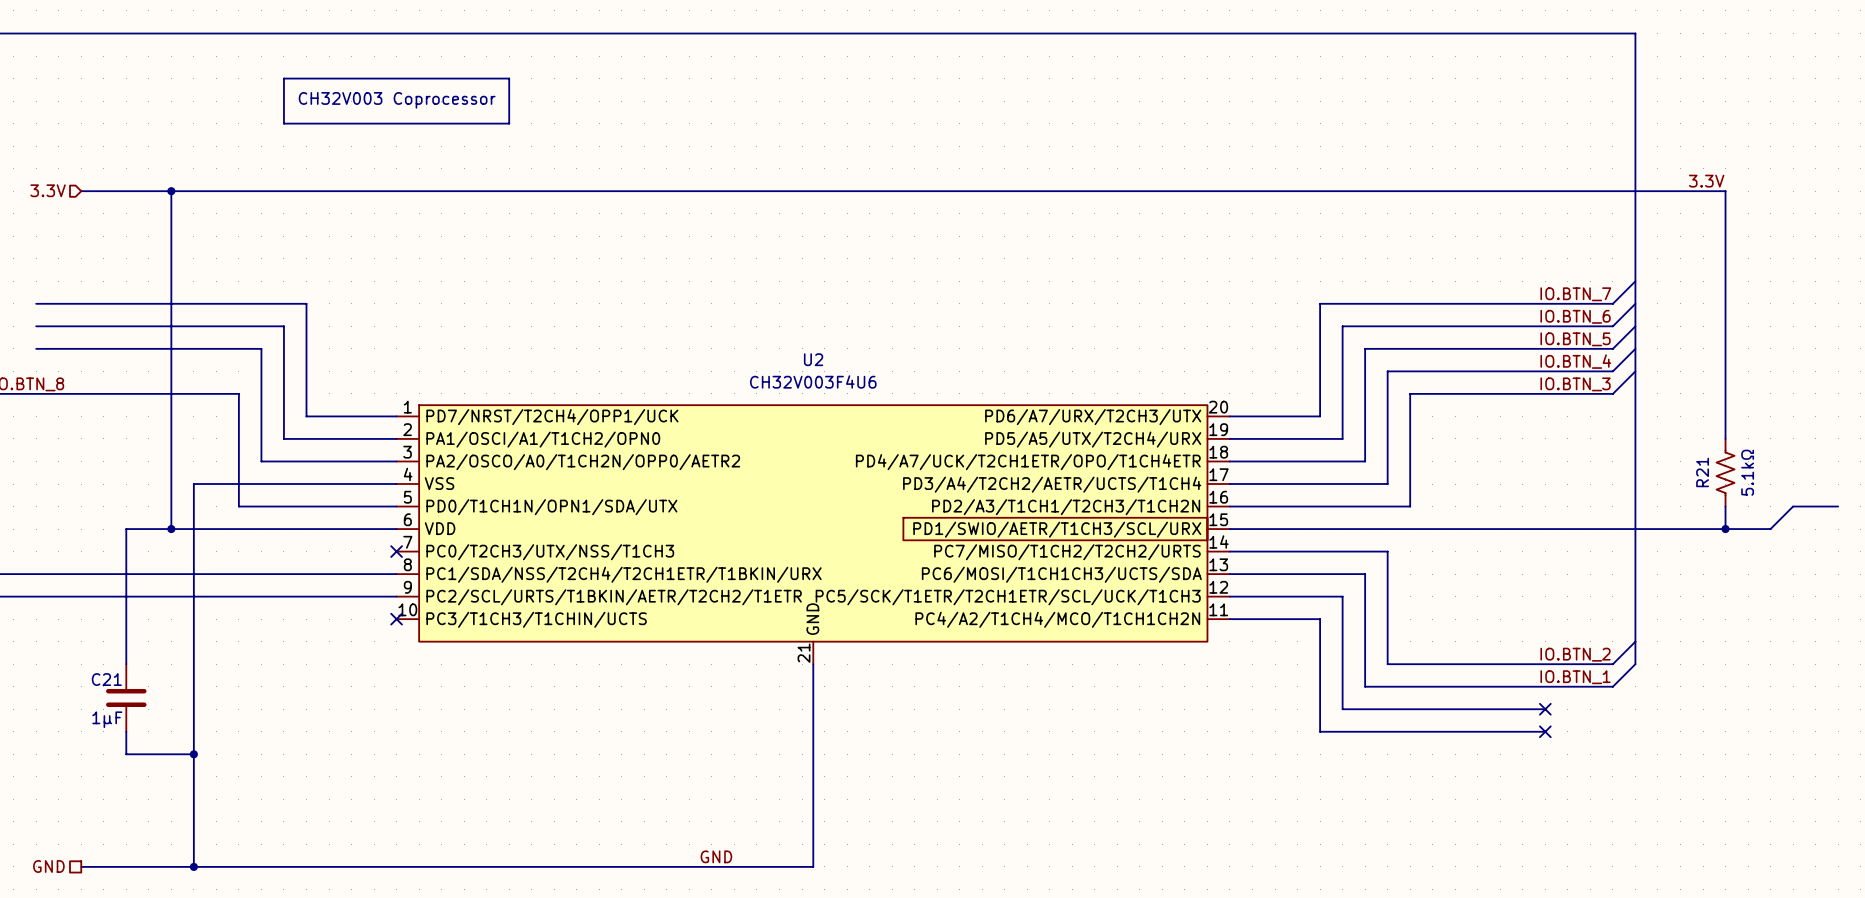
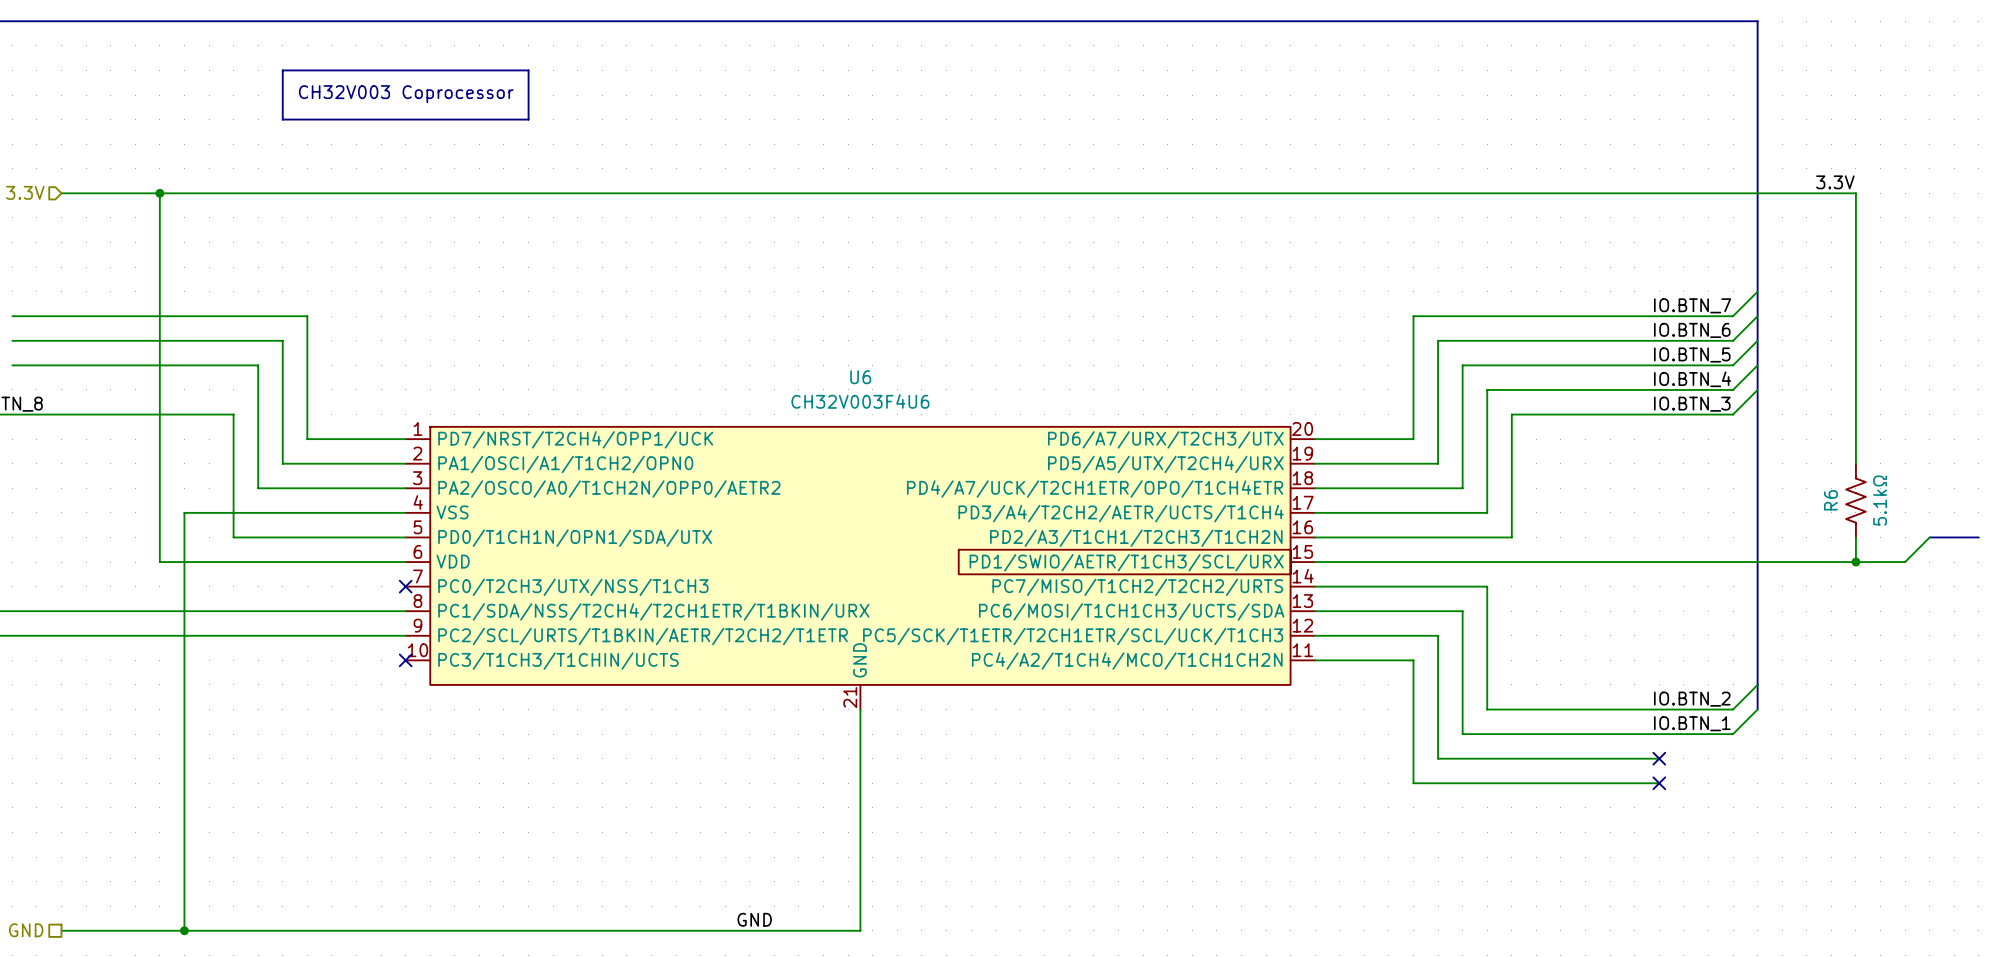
U2 name: U2 (813, 359) -> U6 (860, 377)
R21 name: R21 (1702, 472) -> R6 (1830, 500)
wire: (171, 529) (126, 529) (126, 664) -> none
junction: (171, 529) -> none
C21: 1μF (126, 697) -> none
wire: (126, 731) (126, 754) (193, 754) -> none
junction: (193, 754) -> none

